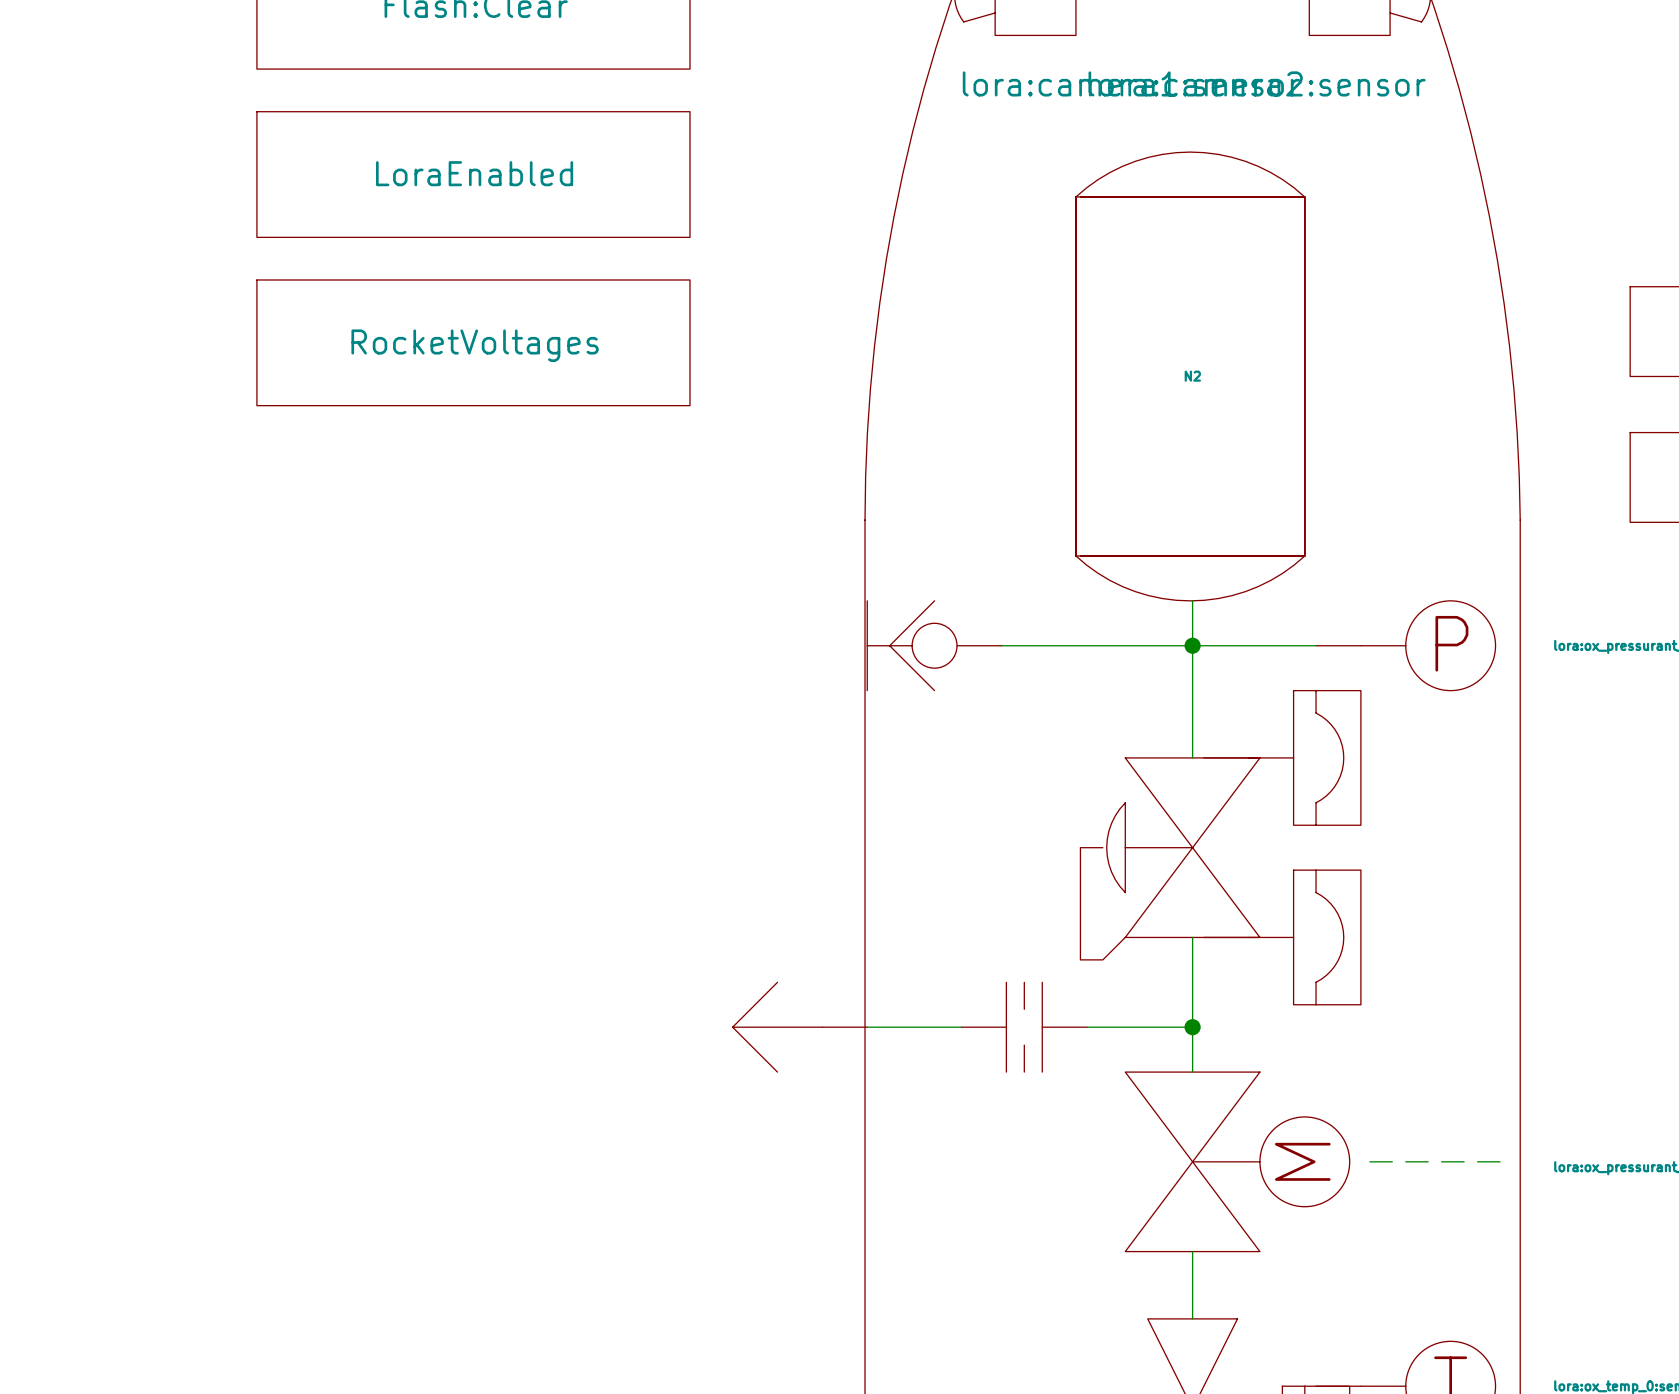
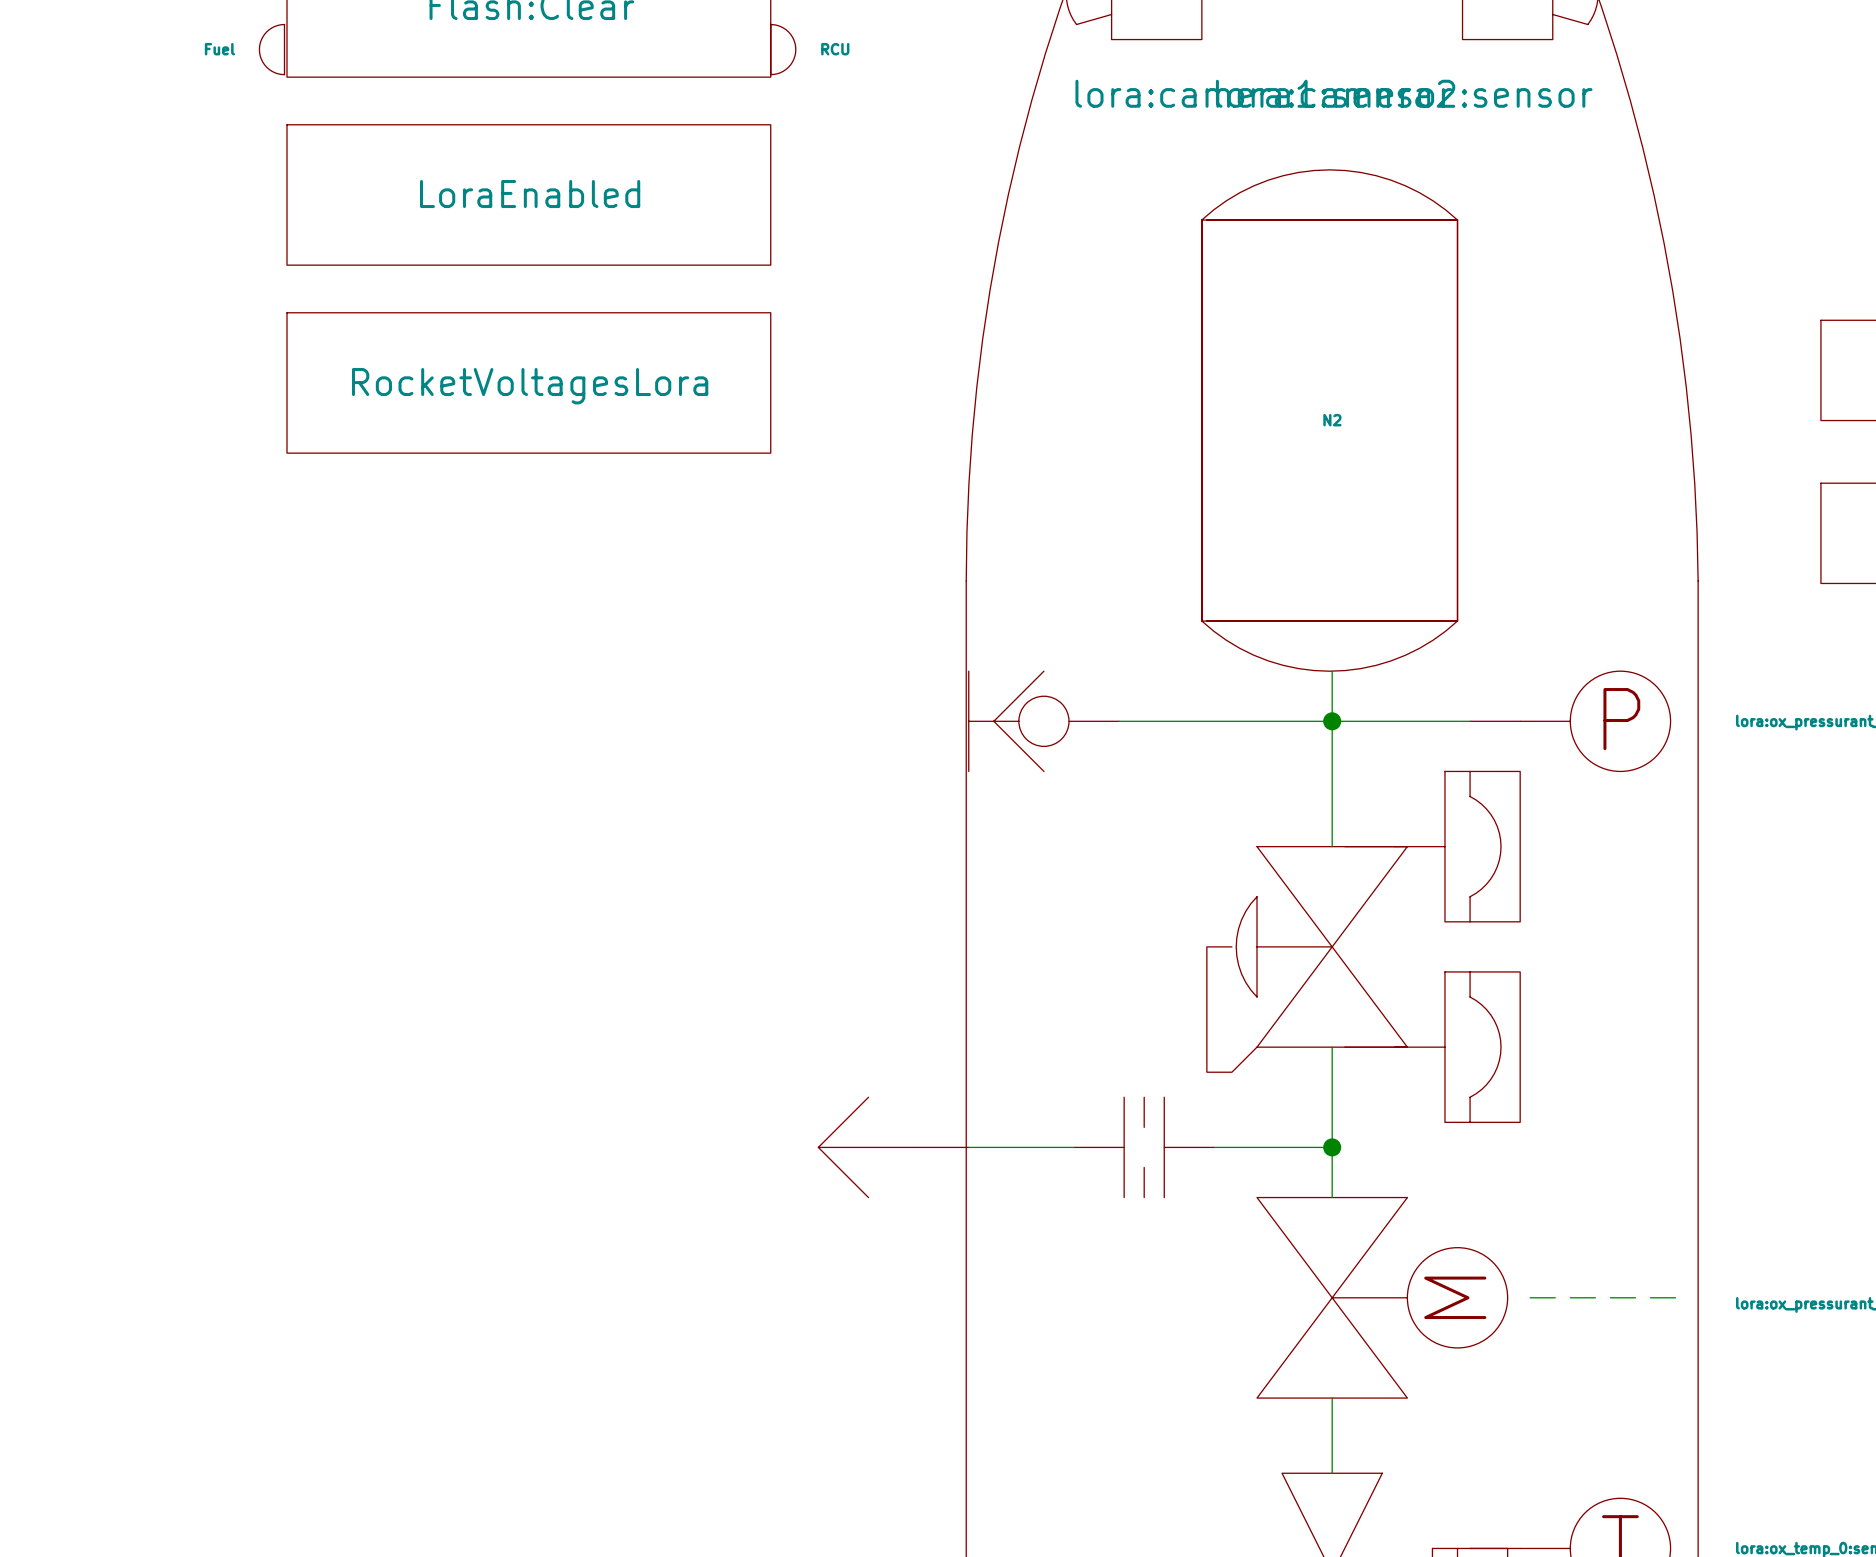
Fuel: none -> (271, 49)
RCU: none -> (783, 49)
part value: RocketVoltages (475, 345) -> RocketVoltagesLora (530, 386)

